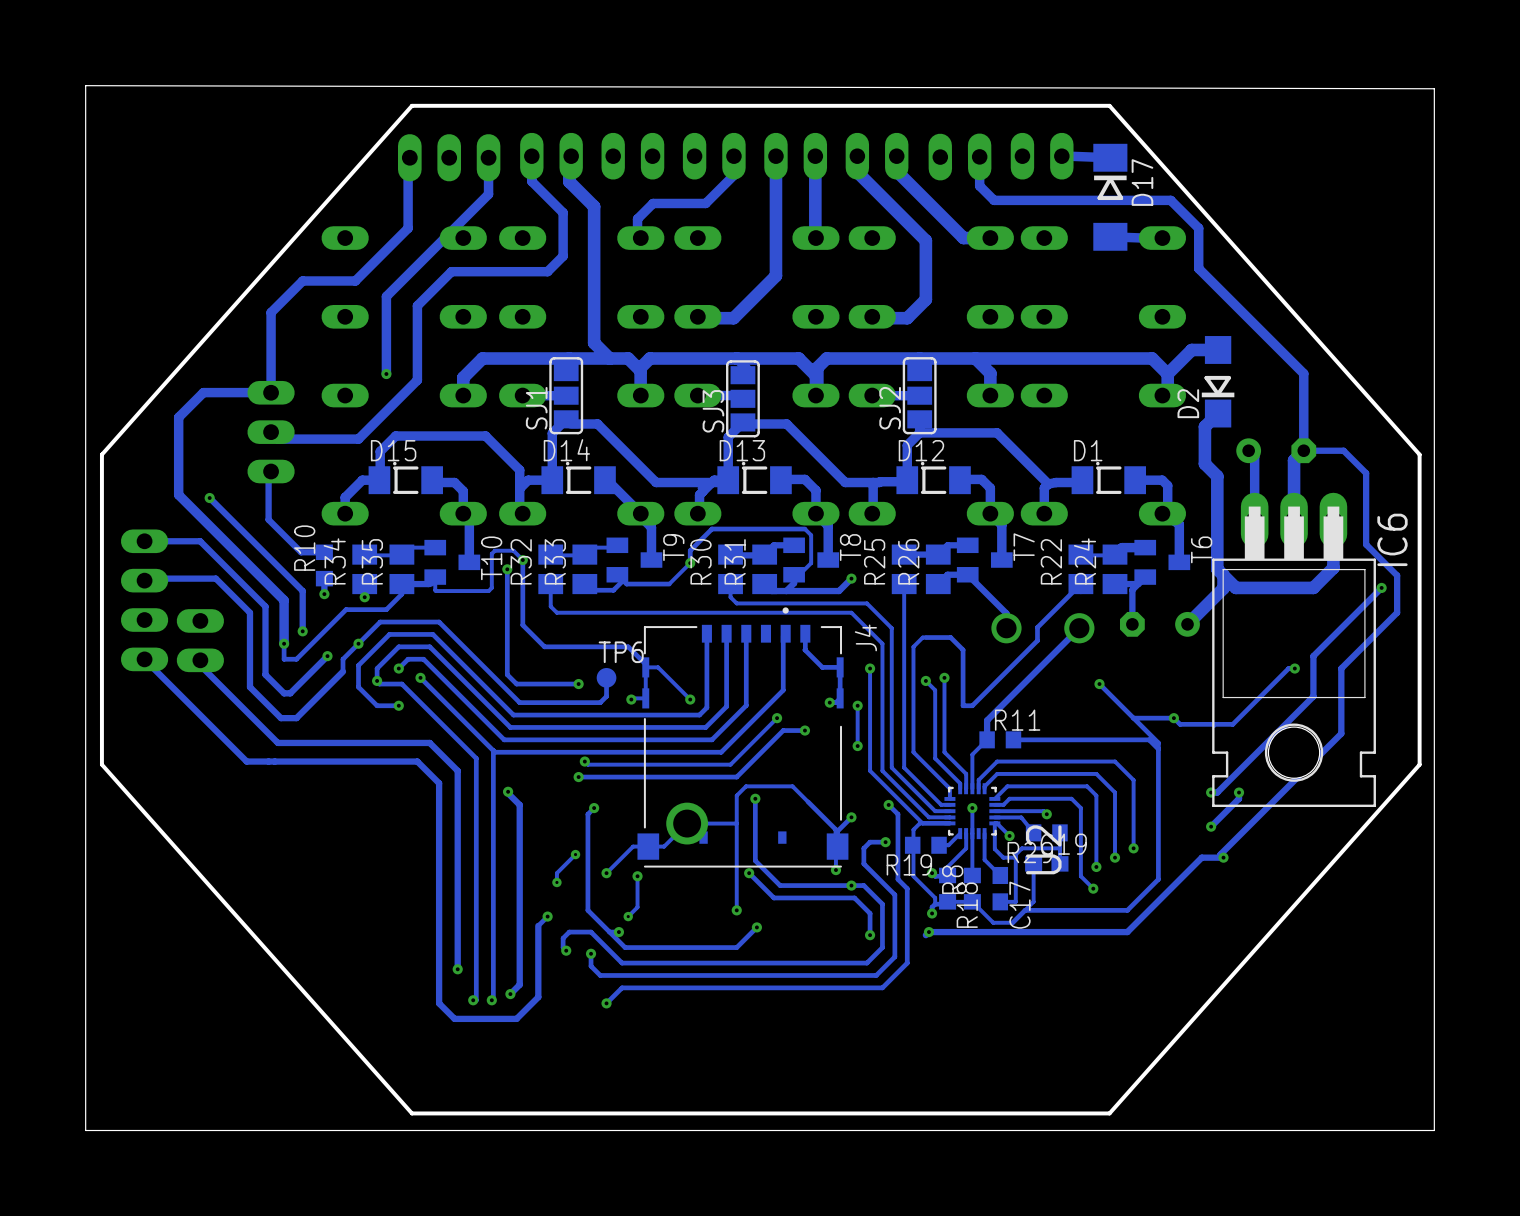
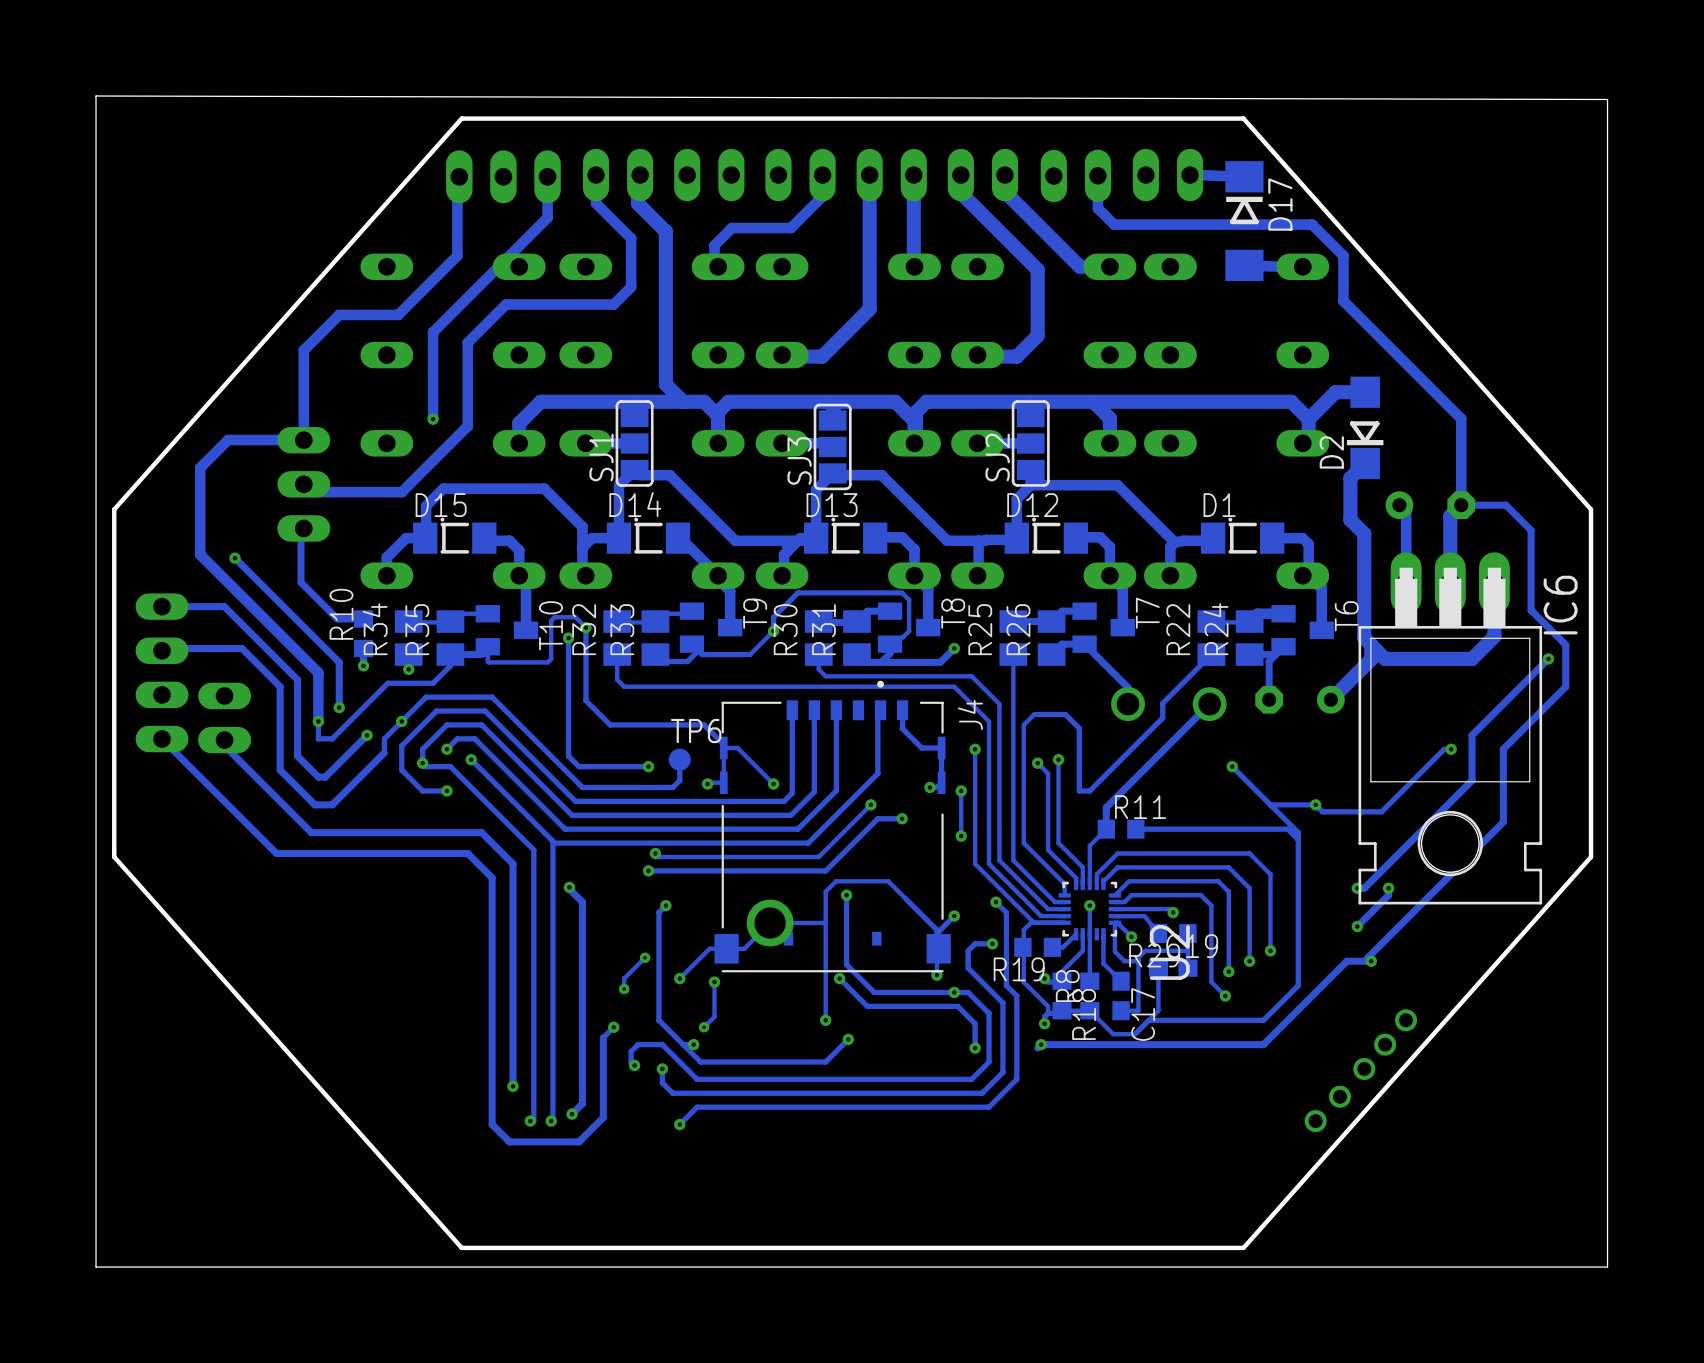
via: none -> (1406, 1020)
via: none -> (1385, 1044)
via: none -> (1364, 1068)
via: none -> (1339, 1096)
via: none -> (1315, 1121)

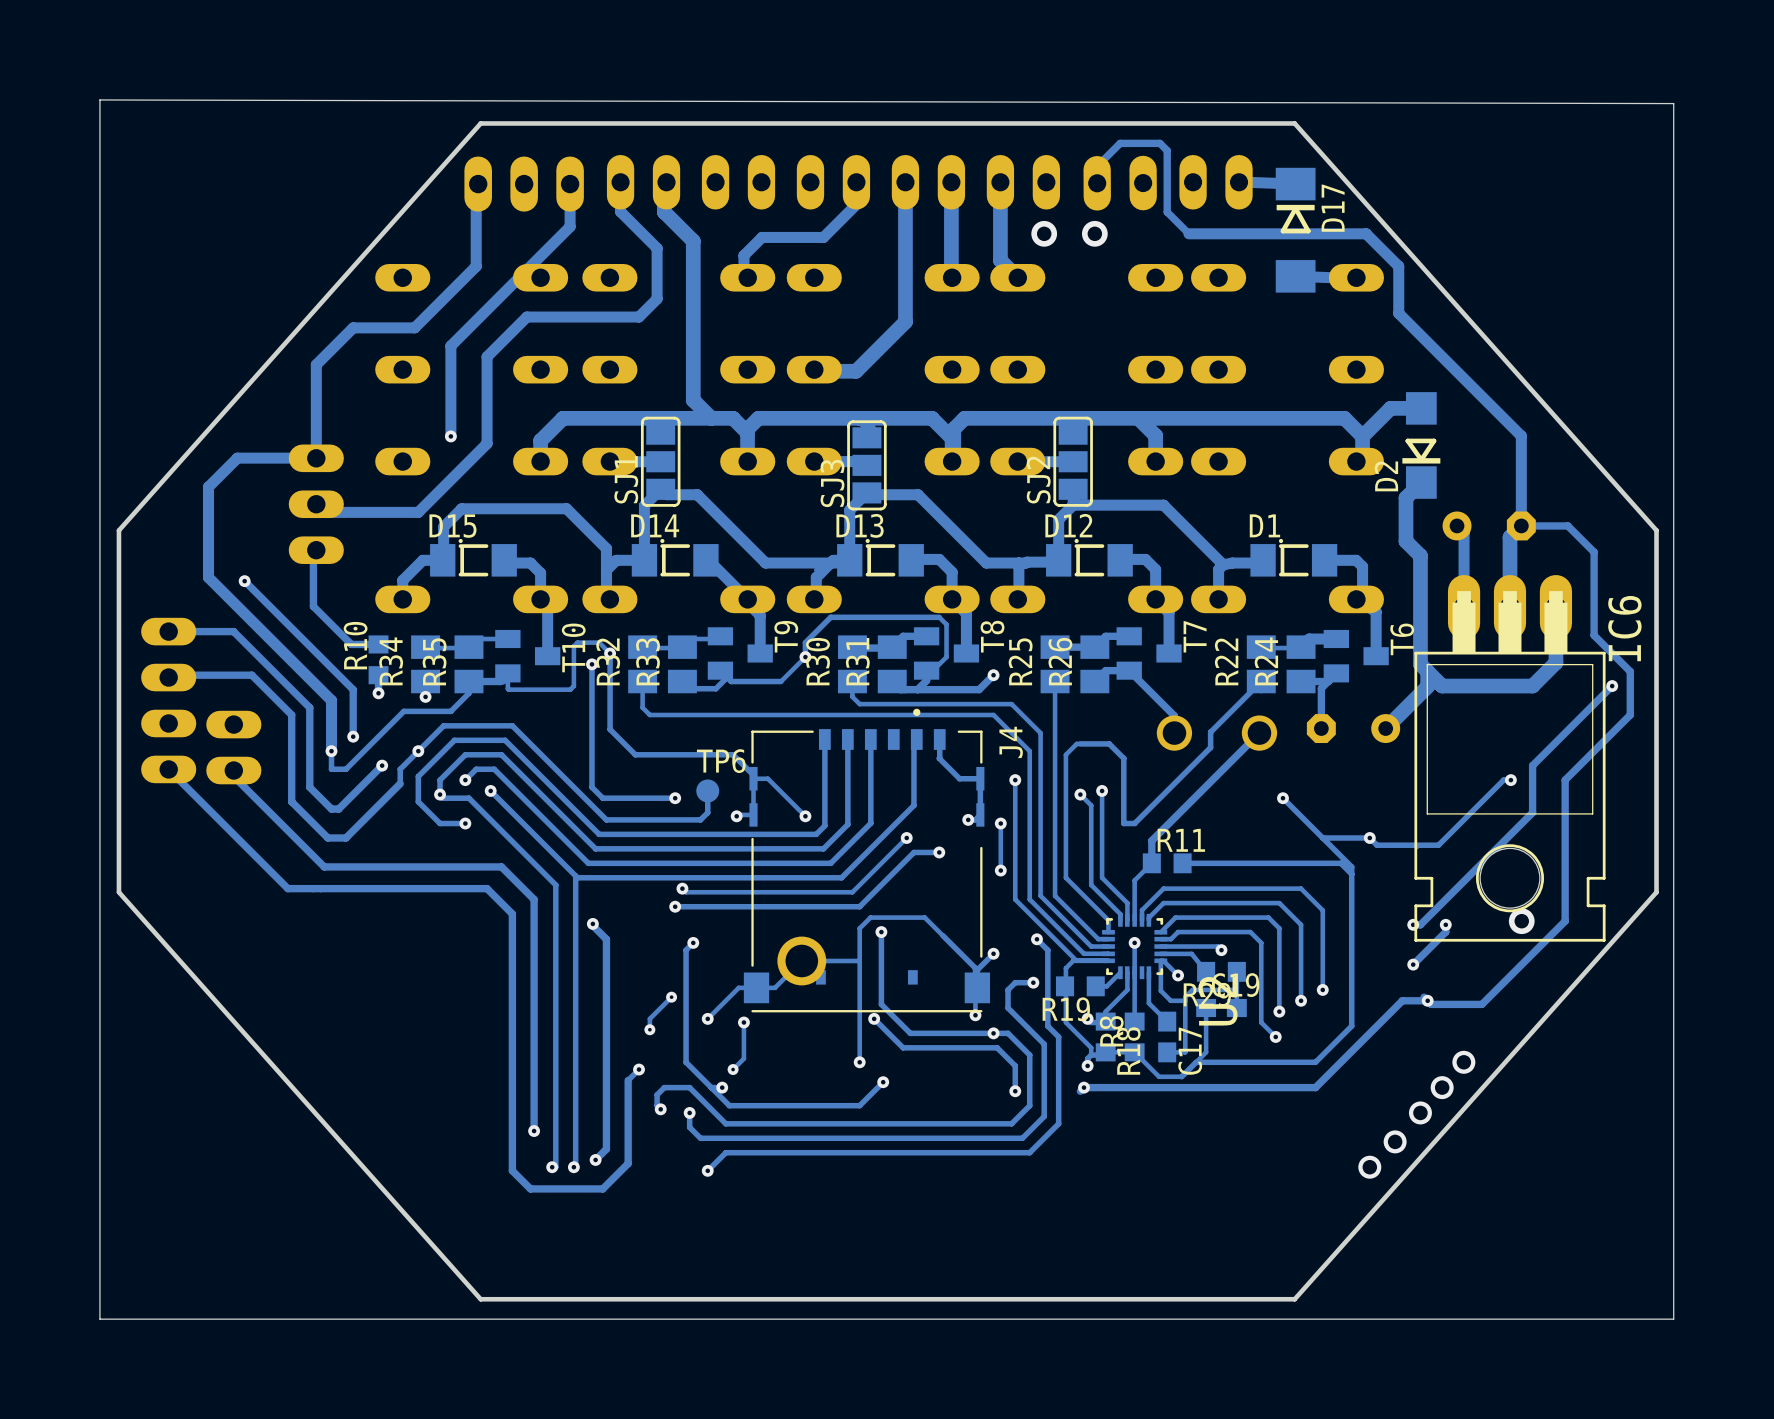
track: (1005, 175) (1006, 193) (1079, 266) (1109, 266) -> none
track: (1097, 175) (1097, 208) (1114, 224) (1141, 224) -> (1097, 183) (1097, 166) (1120, 143) (1159, 143) (1167, 150) (1167, 212) (1188, 233)
track: (960, 192) (1037, 269) (1037, 335) (1016, 356) (979, 356) (977, 355) -> (1000, 200) (1000, 260) (1017, 277)
via: none -> (1044, 233)
via: none -> (1094, 233)
track: (1503, 822) (1367, 957) -> (1565, 856) (1565, 921) (1481, 1004) (1431, 1004) (1427, 1000)
via: none -> (1521, 921)

